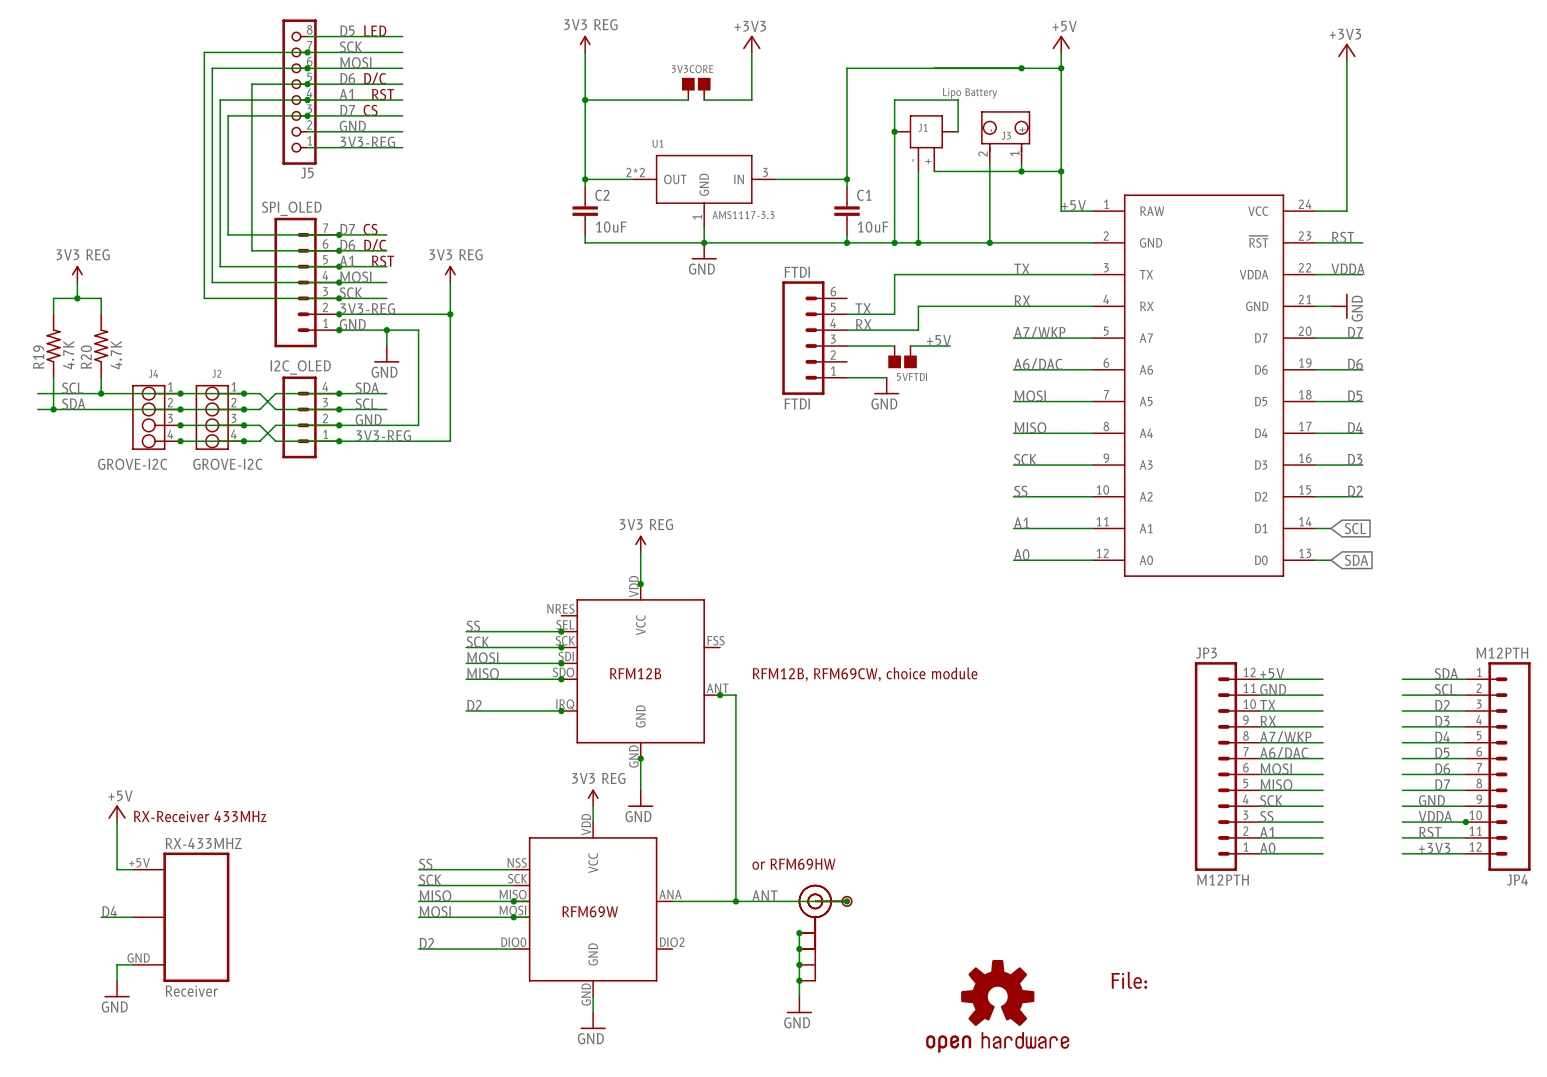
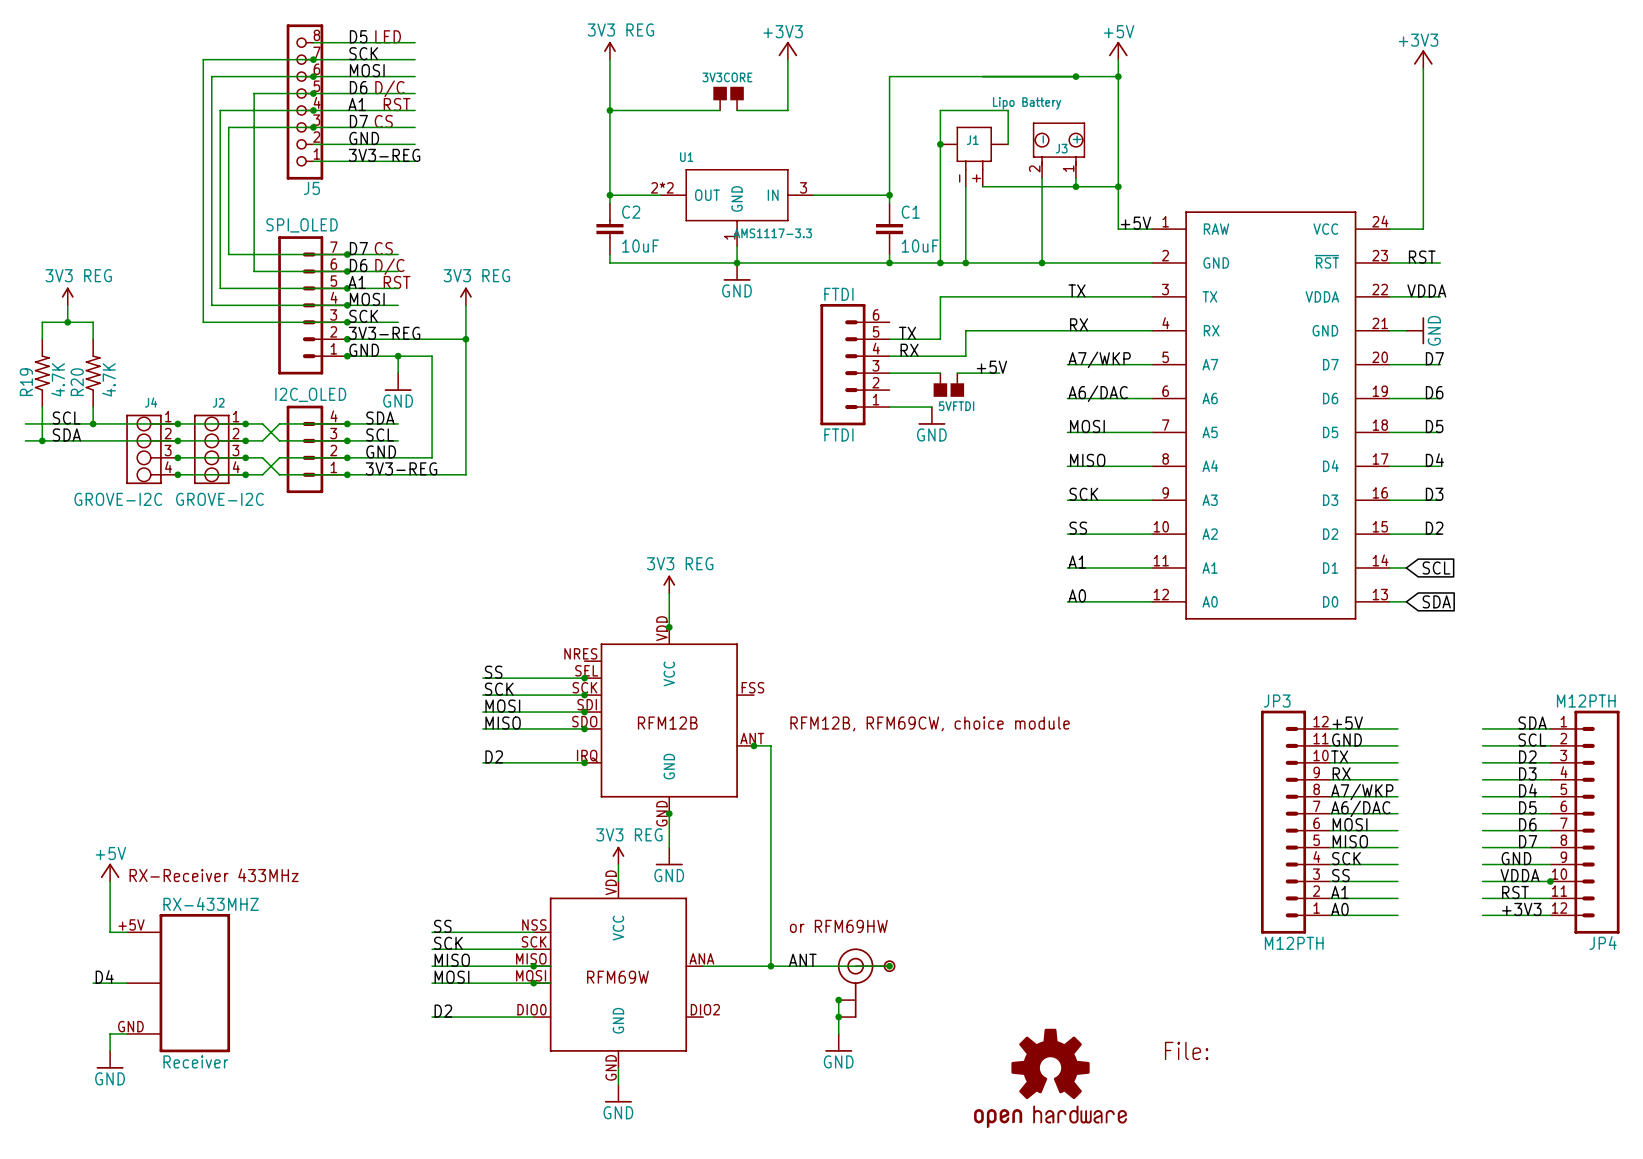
part: (822, 933) -> none
junction: (799, 964) -> none
junction: (799, 980) -> none
power symbol position: GND (799, 1004) -> GND (838, 1042)

